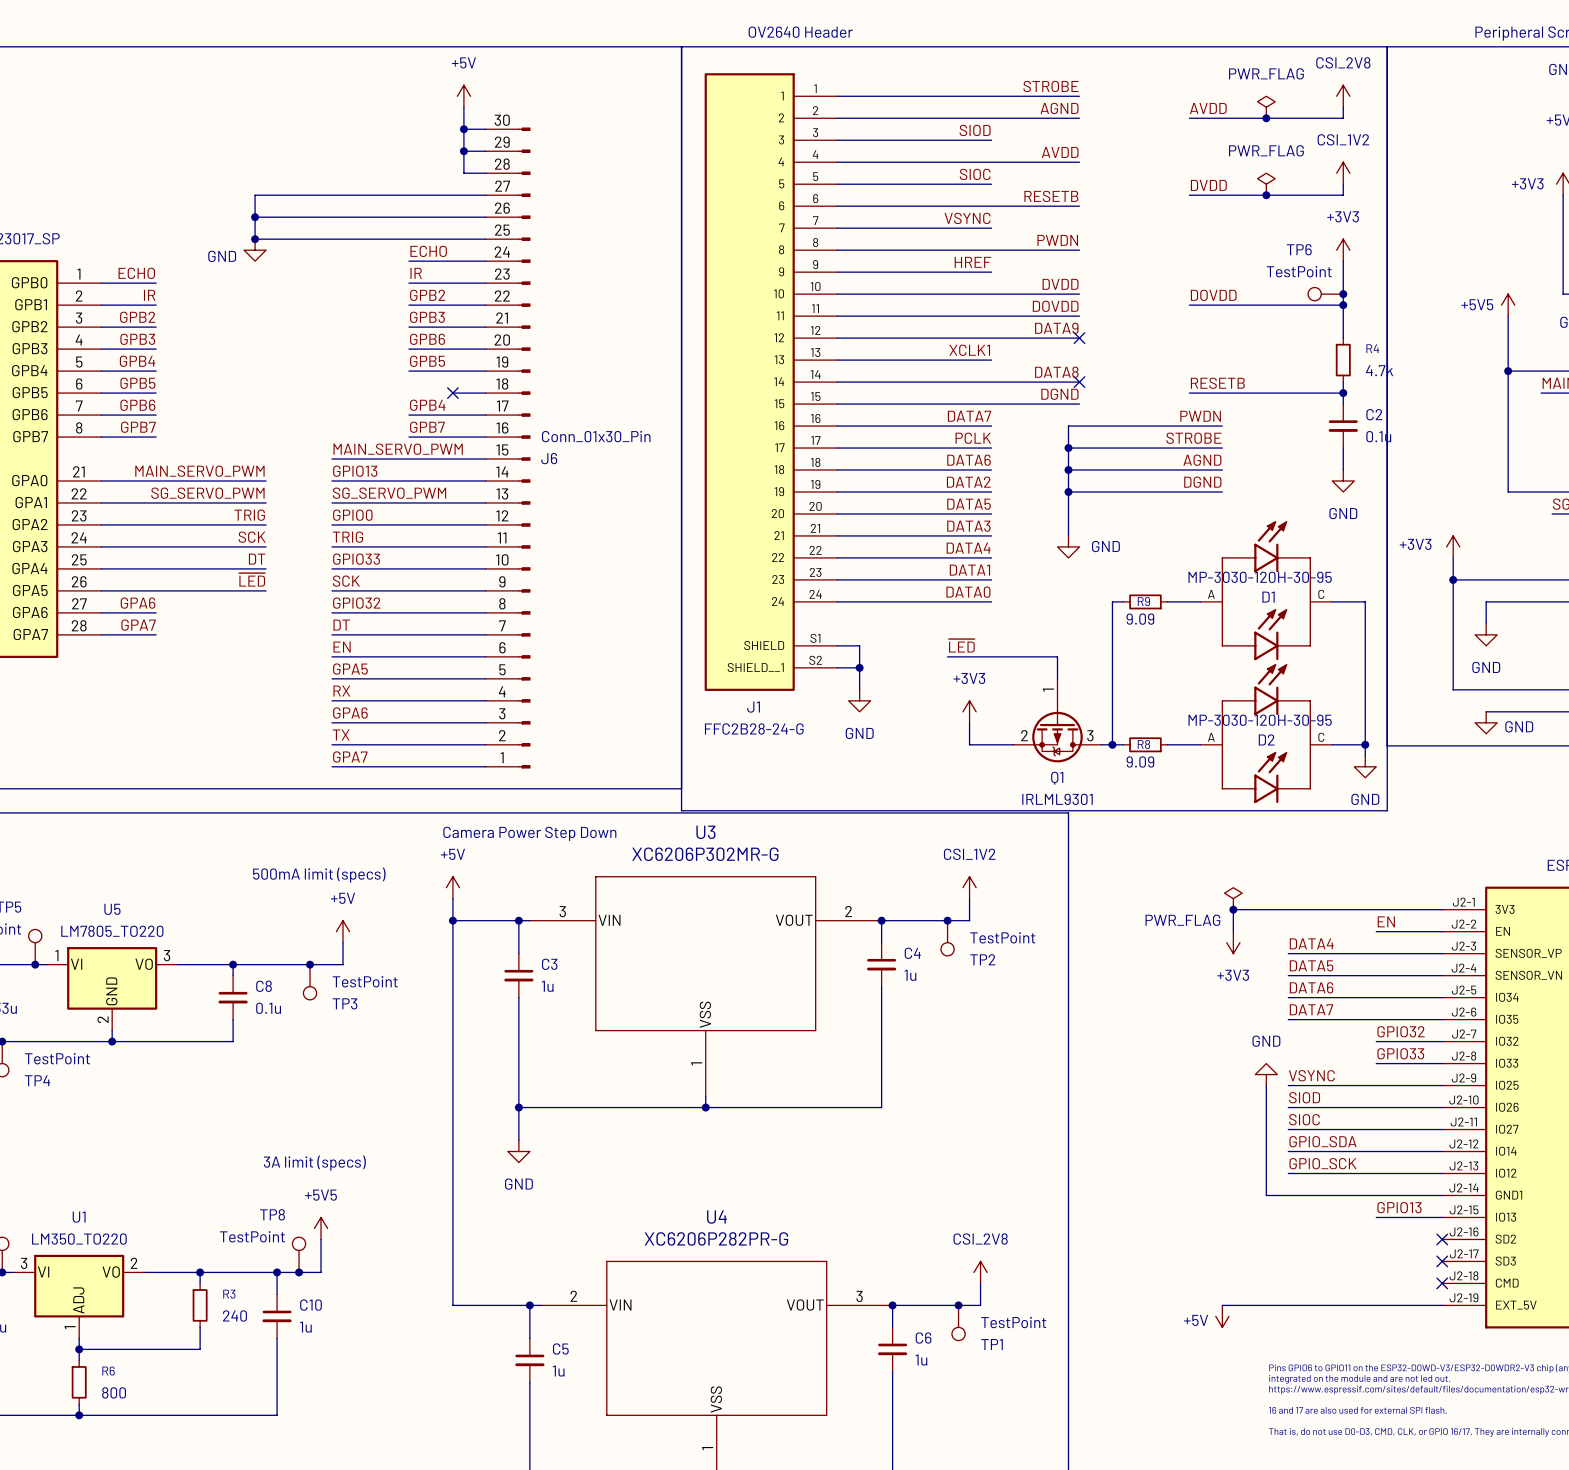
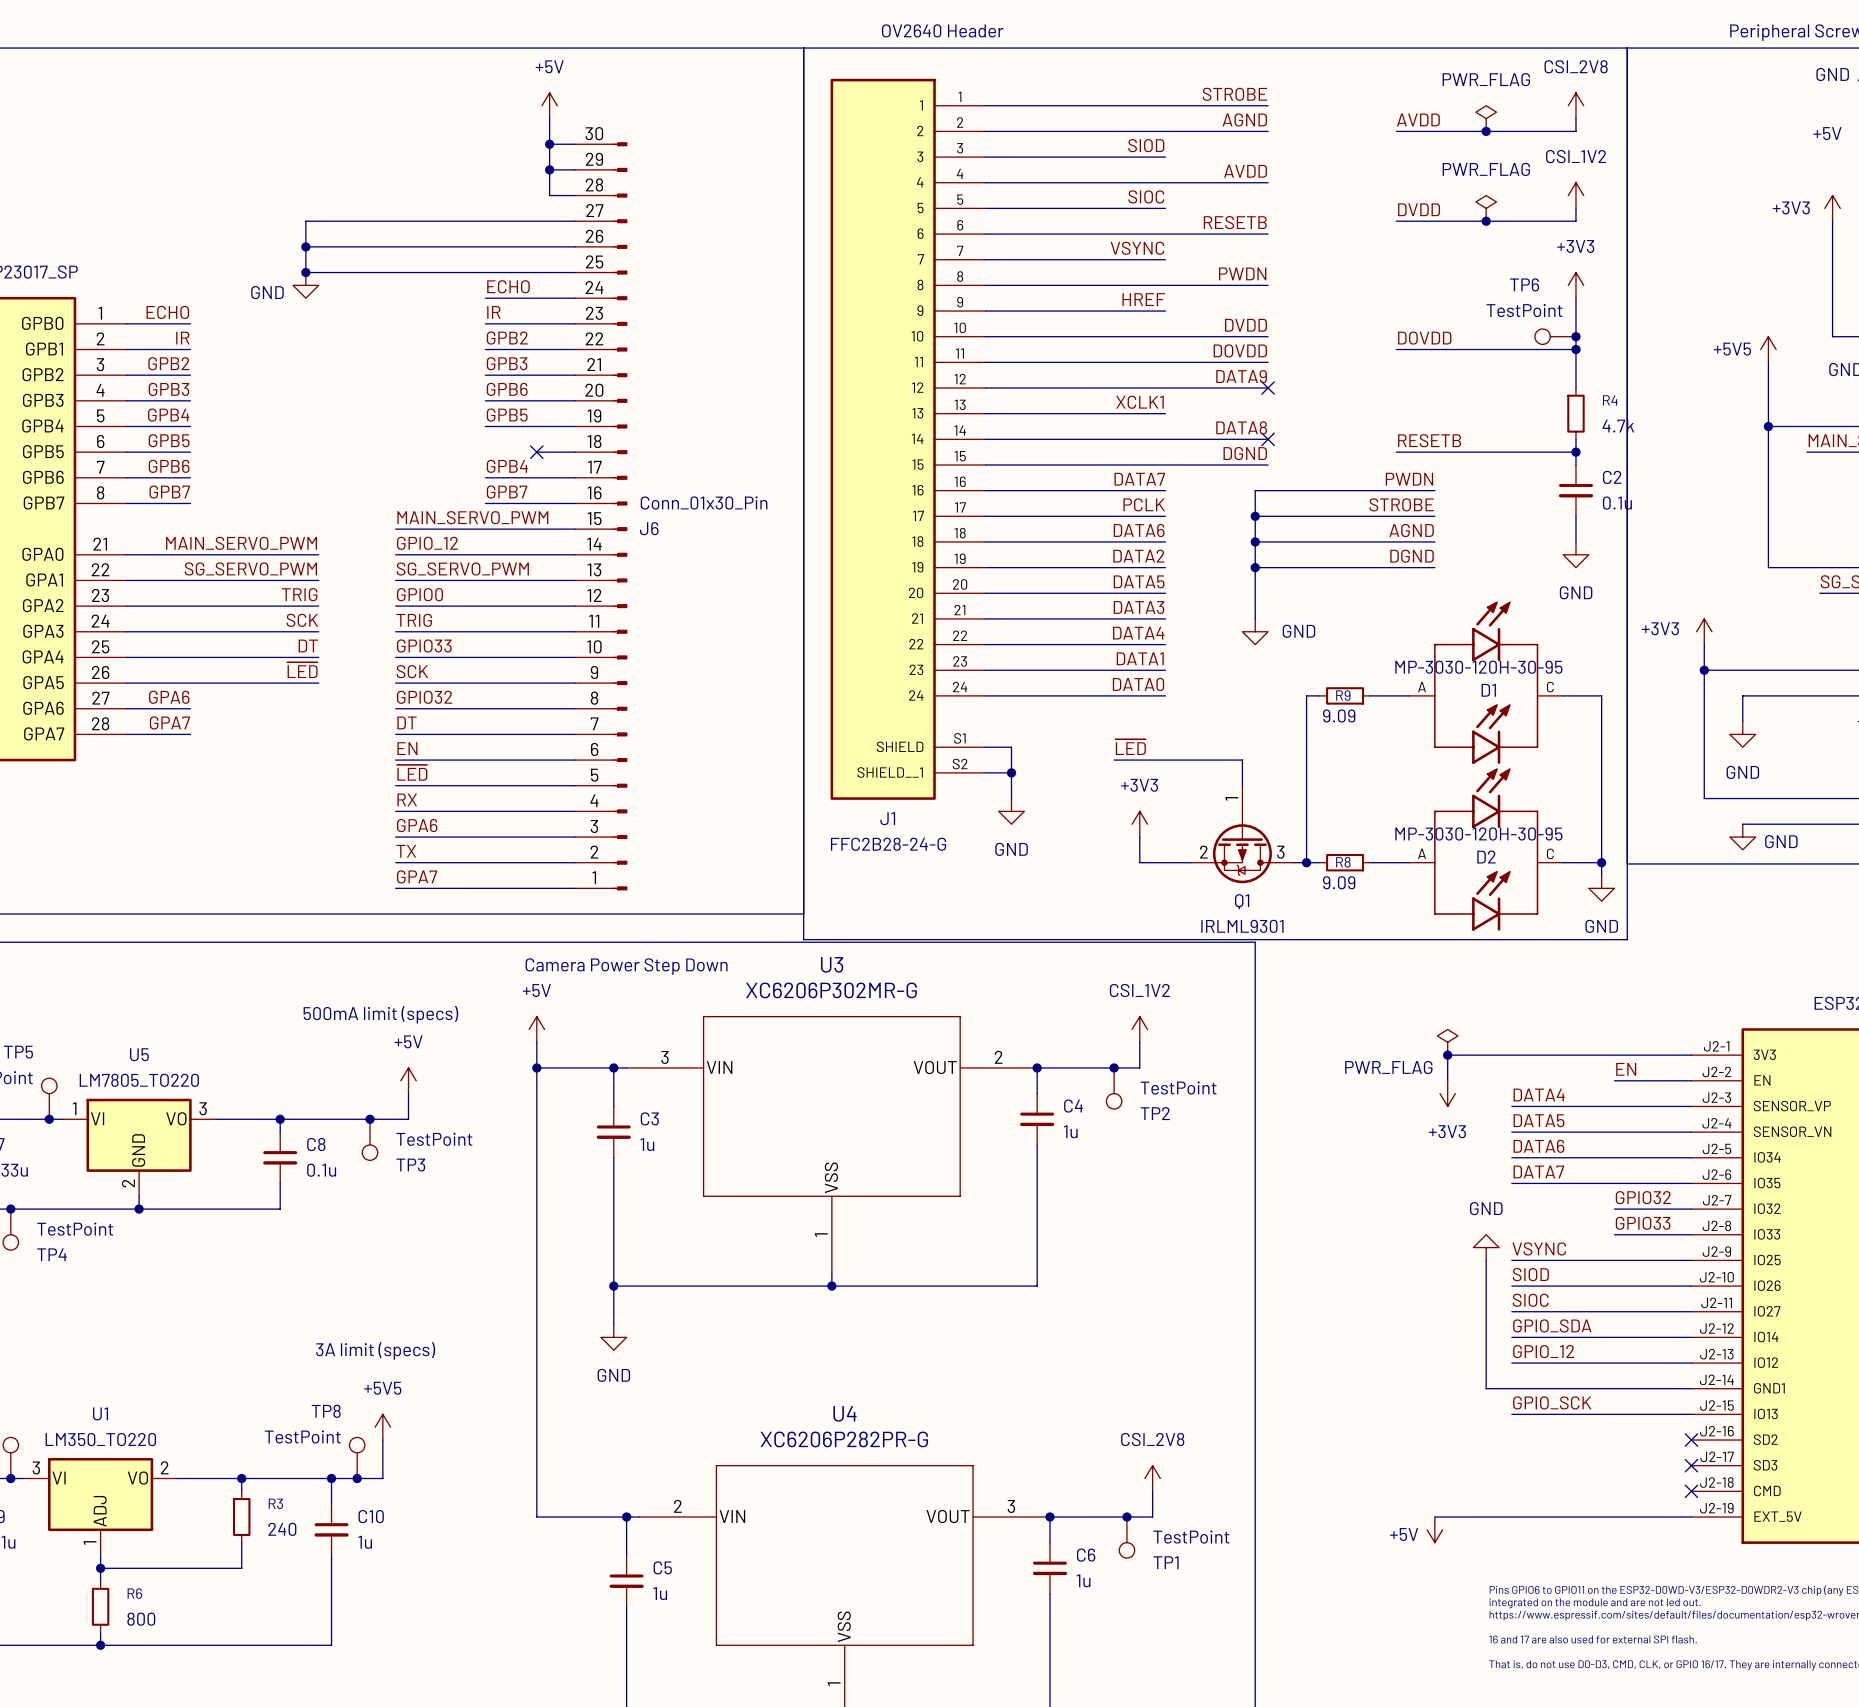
label: GPIO13 (355, 471) -> GPIO_12 (427, 543)
label: GPA5 (350, 669) -> ~{LED} (412, 772)
label: GPIO_SCK (1323, 1163) -> GPIO_12 (1543, 1351)
label: none -> GPIO_SCK (1552, 1402)
label: GPIO13 (1399, 1207) -> none
wire: none -> (1511, 1414) (1614, 1414)

